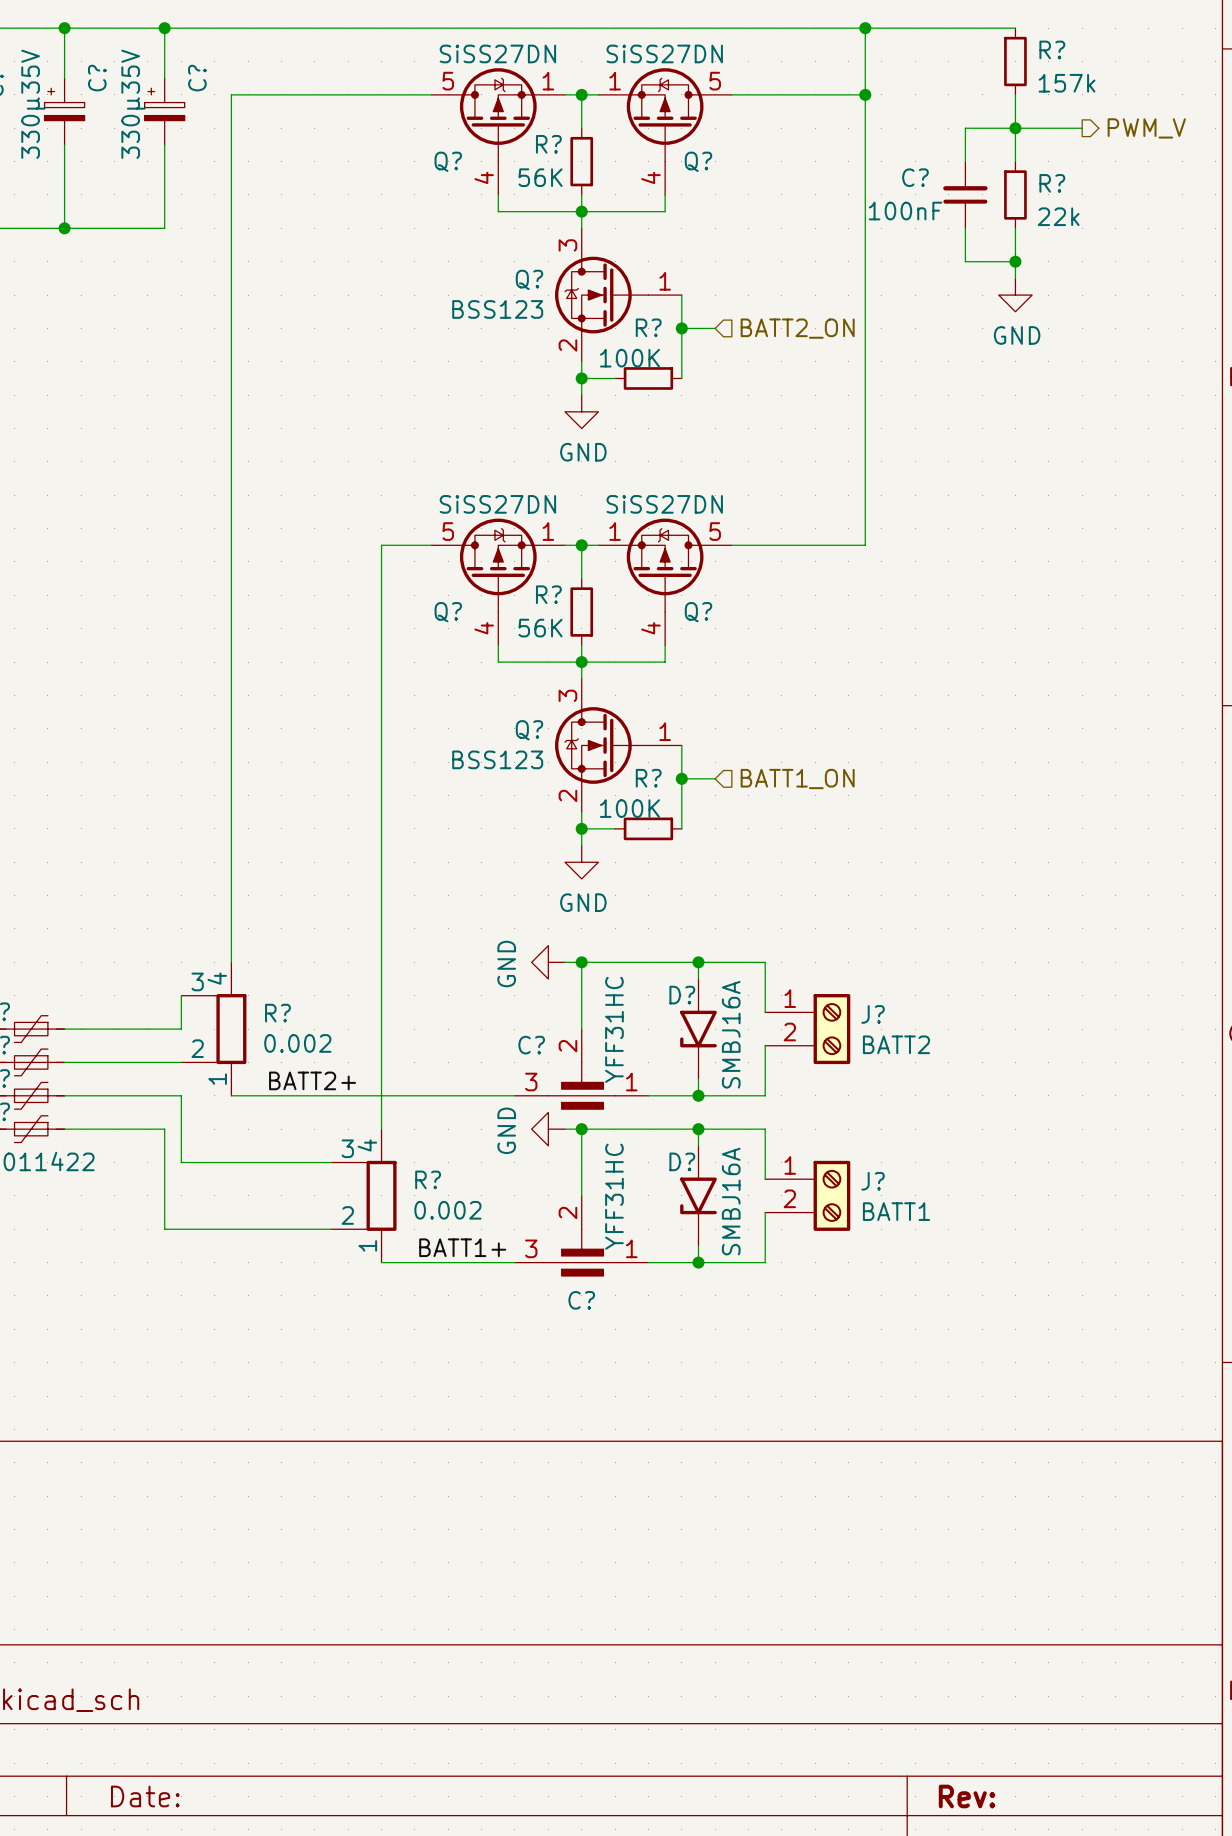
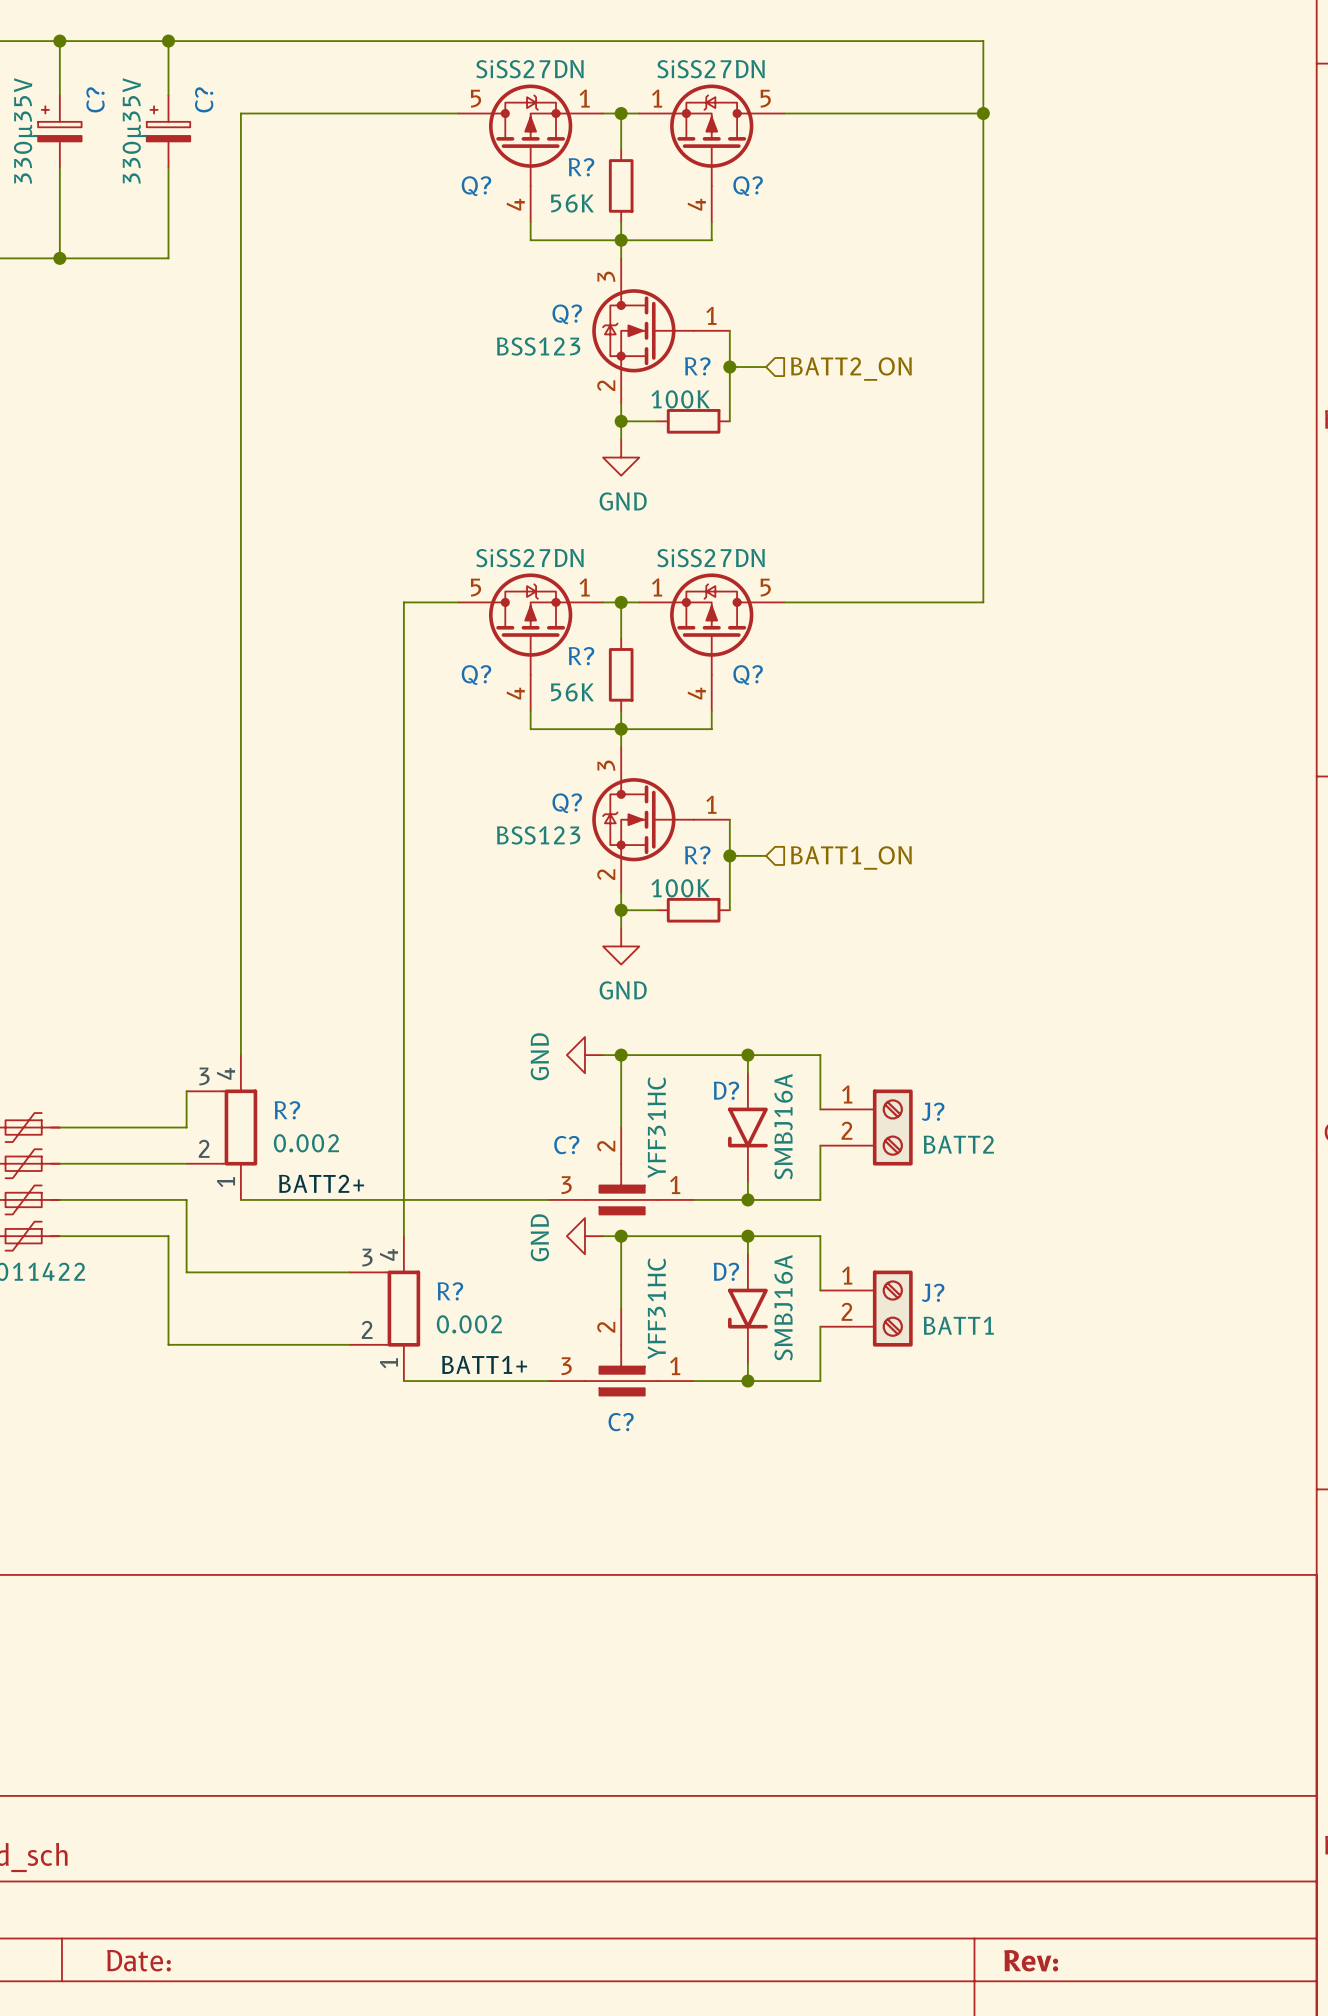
wire: (865, 28) (865, 545) -> (983, 41) (983, 602) (929, 602)
junction: (865, 28) -> none
wire: (915, 28) (1015, 28) -> none
R?: 157k (1015, 61) -> none
wire: none -> (929, 113) (983, 113)
junction: (865, 94) -> none
junction: none -> (983, 113)
wire: (1015, 94) (1015, 161) -> none
junction: (1015, 128) -> none
wire: (1082, 128) (965, 128) (965, 161) -> none
hierarchical label: PWM_V (1146, 128) -> none
C?: 100nF (965, 194) -> none
R?: 22k (1015, 194) -> none
wire: (965, 228) (965, 261) (1015, 261) -> none
wire: (1015, 228) (1015, 278) -> none
junction: (1015, 261) -> none
power symbol: GND (1015, 295) -> none

